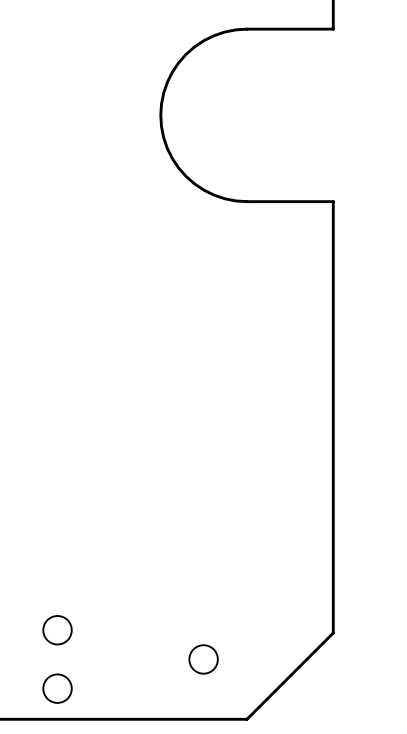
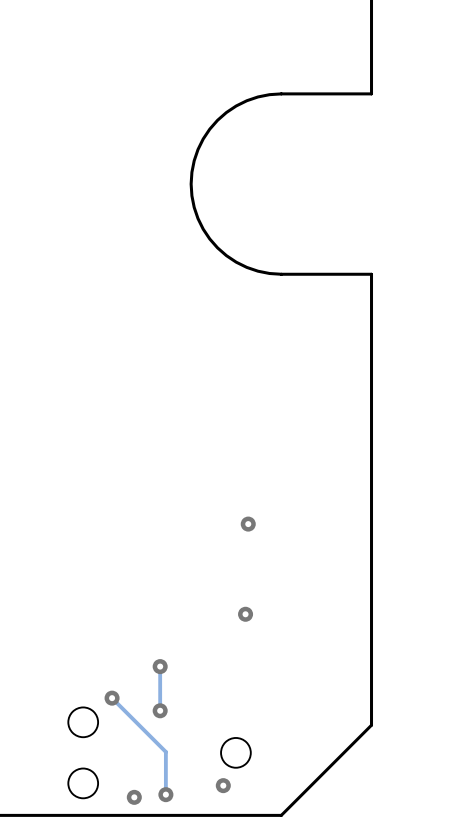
via: none -> (248, 524)
via: none -> (245, 614)
track: none -> (160, 666) (160, 710)
via: none -> (160, 666)
track: none -> (112, 698) (165, 751) (165, 794)
via: none -> (112, 698)
via: none -> (160, 710)
via: none -> (223, 785)
via: none -> (165, 794)
via: none -> (134, 797)

